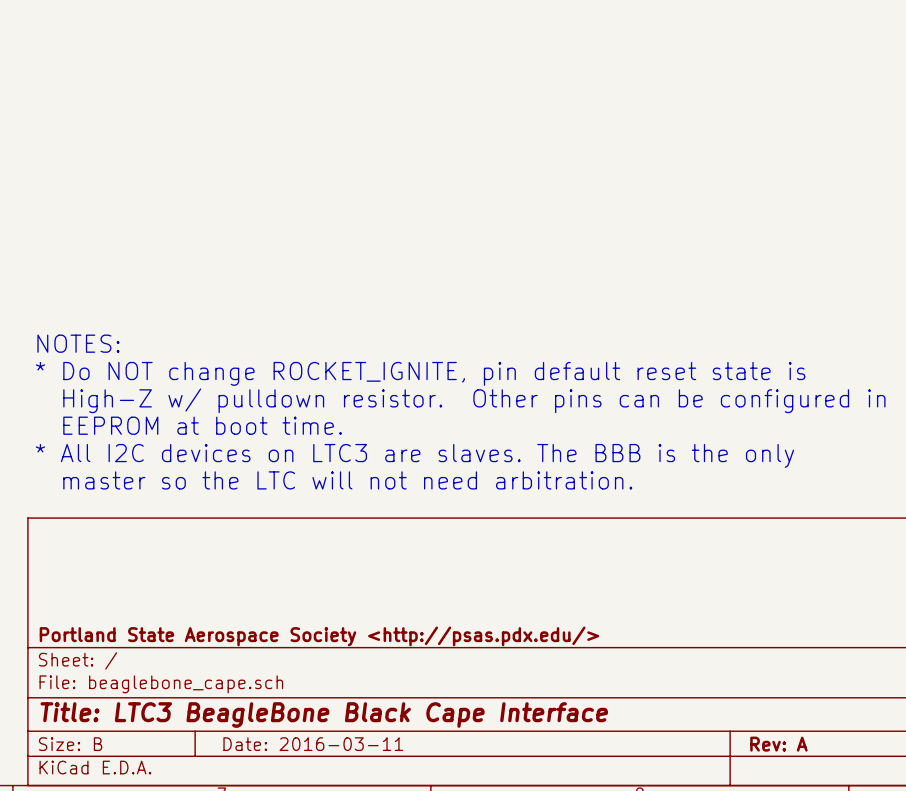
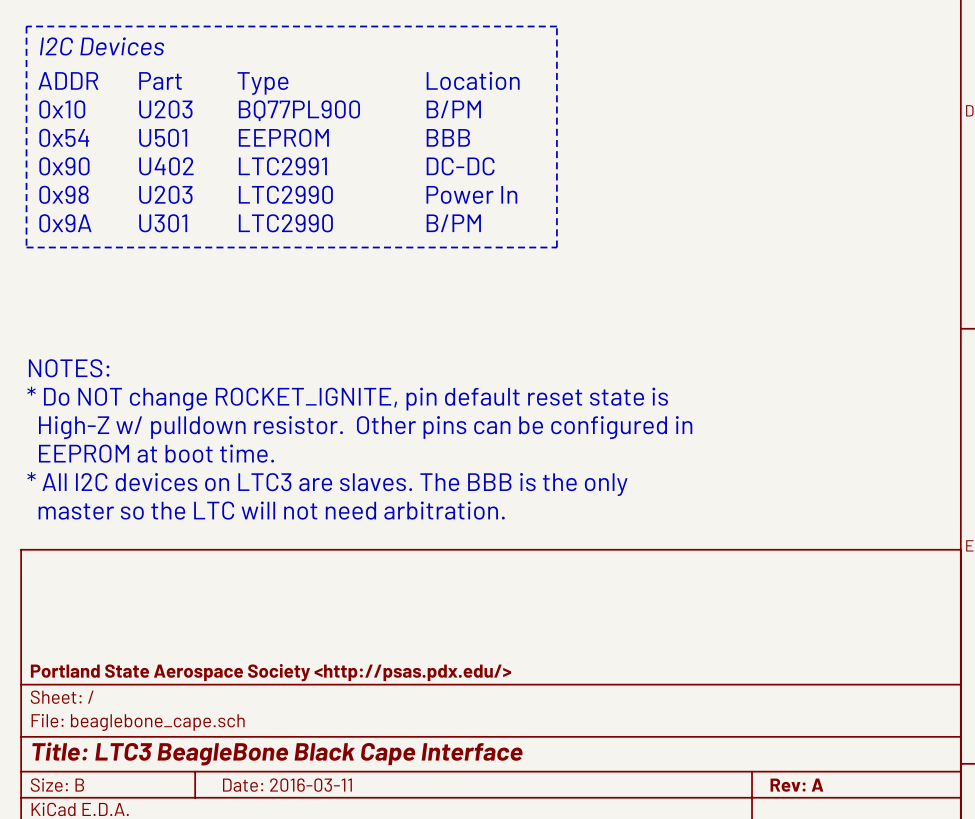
line: none -> (26, 26) (26, 247) (556, 247) (556, 26) (26, 26)
text: none -> I2C Devices (102, 46)
text: none -> ADDR (68, 80)
text: none -> Part (160, 81)
text: none -> Location (473, 80)
text: none -> Type (262, 83)
text: none -> 0x10 (62, 109)
text: none -> U203 (165, 109)
text: none -> BQ77PL900 (299, 110)
text: none -> B/PM (453, 109)
text: none -> 0x54 (64, 137)
text: none -> U501 (163, 137)
text: none -> EEPROM (283, 137)
text: none -> BBB (448, 137)
text: none -> 0x90 (64, 166)
text: none -> U402 (166, 166)
text: none -> LTC2991 (282, 166)
text: none -> DC-DC (460, 166)
text: none -> 0x98 (64, 194)
text: none -> U203 (165, 194)
text: none -> LTC2990 (285, 194)
text: none -> Power In (471, 194)
text: none -> 0x9A (65, 223)
text: none -> U301 (163, 223)
text: none -> LTC2990 (285, 223)
text: none -> B/PM (453, 223)

